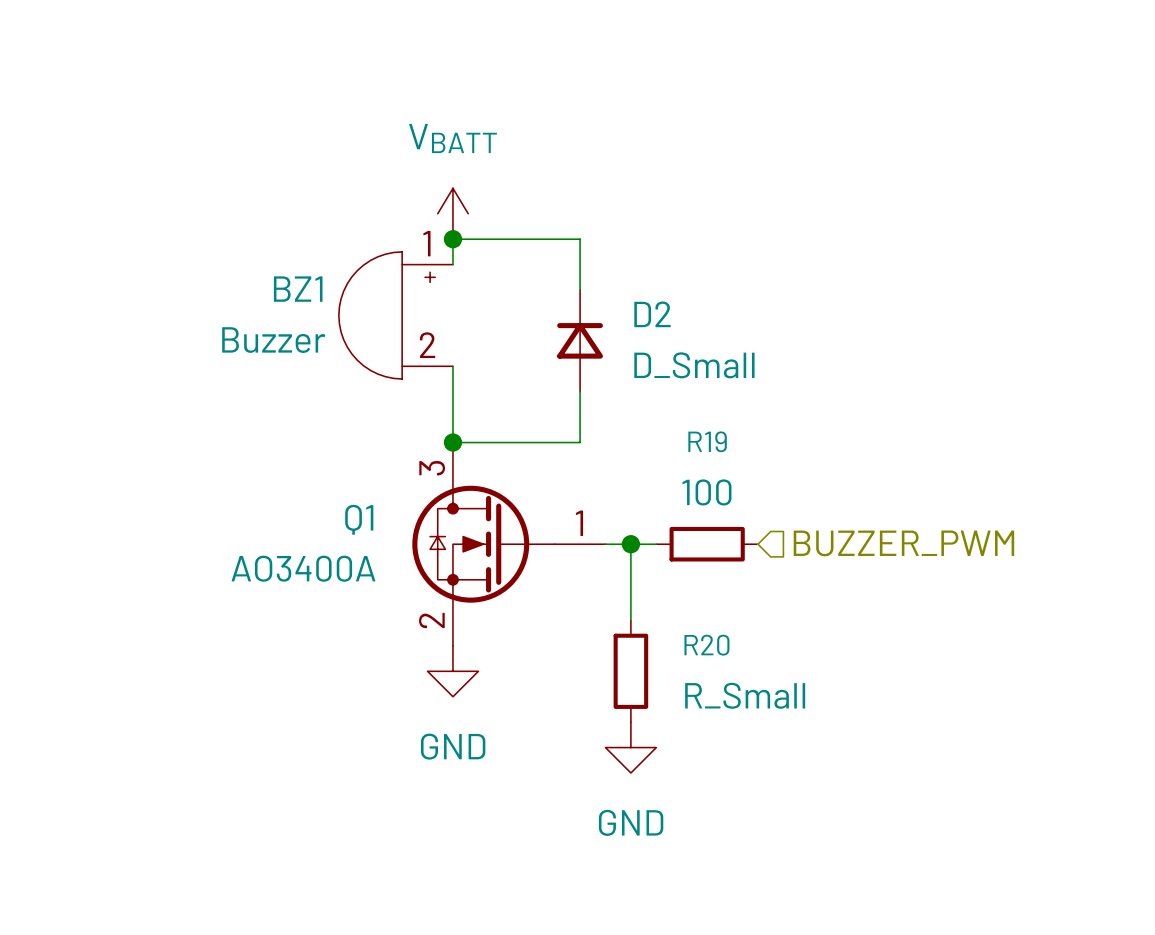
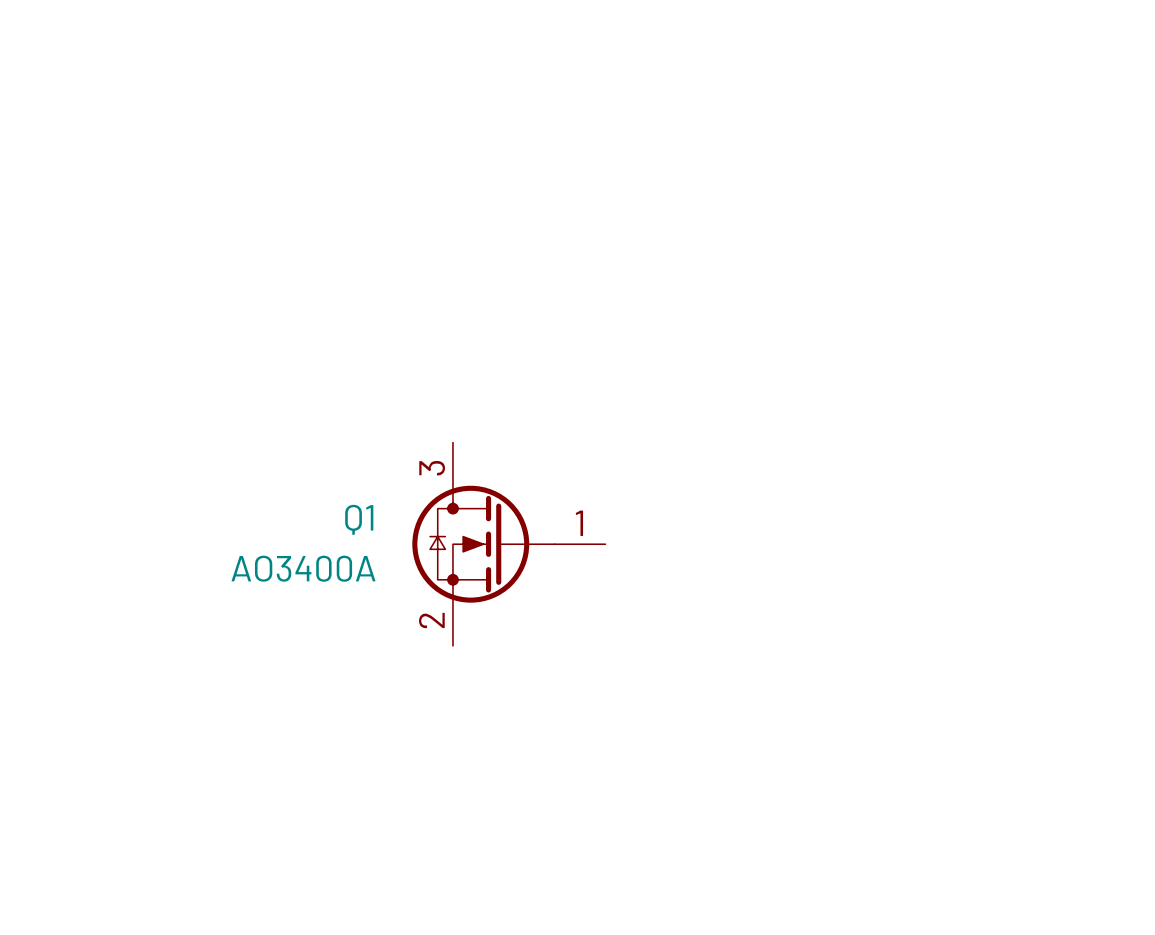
power symbol: VBATT (452, 213) -> none
junction: (452, 239) -> none
wire: (452, 264) (452, 239) (580, 239) (580, 290) -> none
BZ1: Buzzer (395, 315) -> none
D2: D_Small (580, 340) -> none
wire: (452, 366) (452, 442) (580, 442) (580, 391) -> none
junction: (452, 442) -> none
hierarchical label: BUZZER_PWM (903, 543) -> none
wire: (605, 544) (656, 544) -> none
wire: (630, 544) (630, 620) -> none
junction: (630, 544) -> none
R19: 100 (707, 544) -> none
power symbol: GND (452, 671) -> none
R20: R_Small (630, 671) -> none
power symbol: GND (630, 747) -> none

